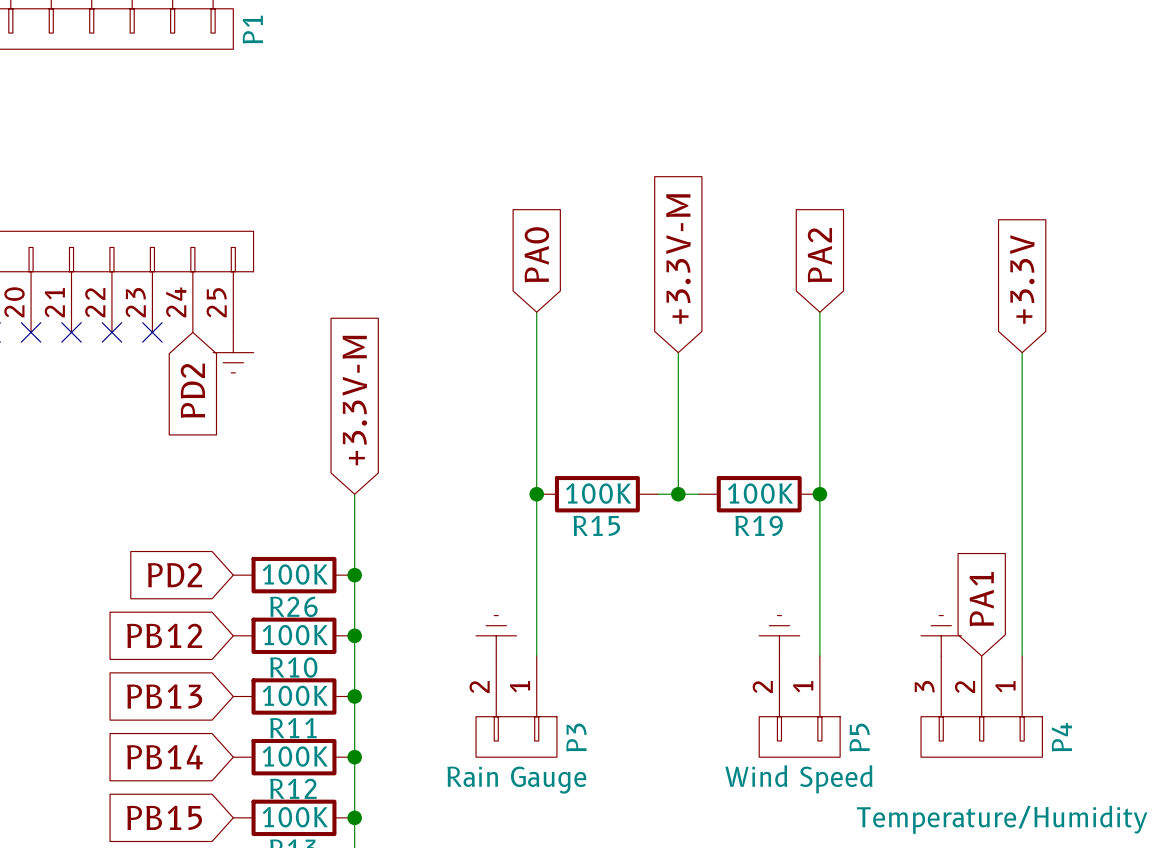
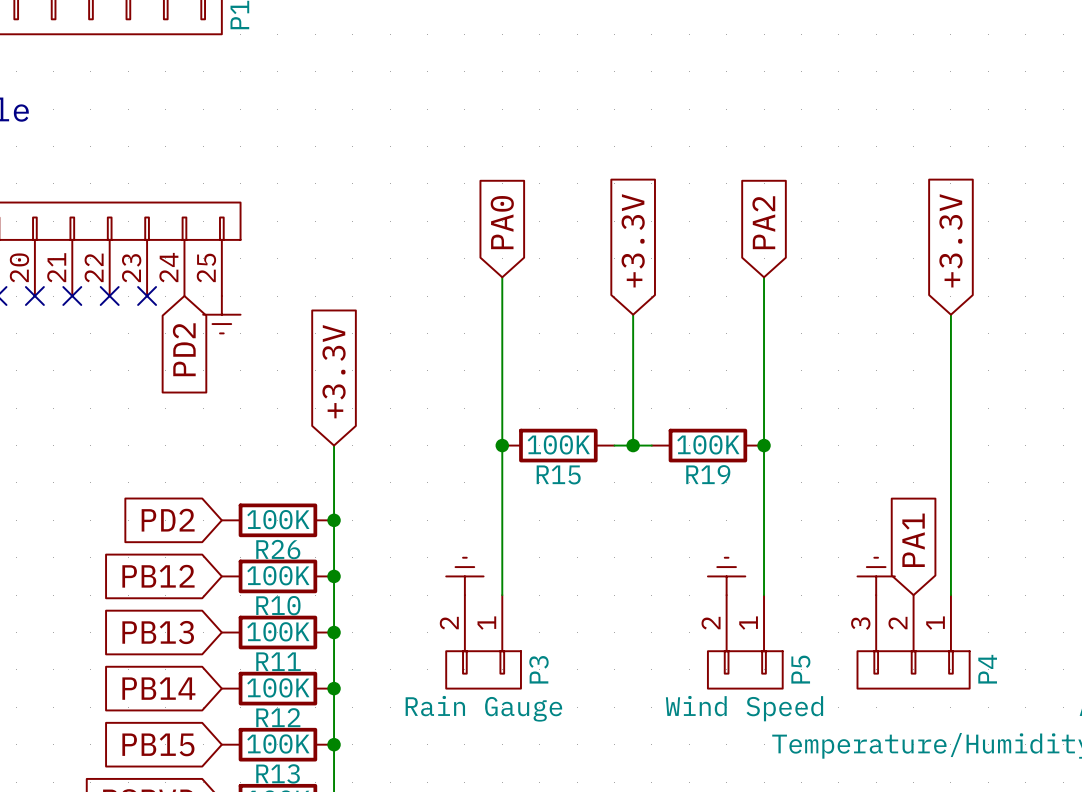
global label: +3.3V-M (678, 258) -> +3.3V (633, 240)
global label: +3.3V-M (354, 400) -> +3.3V (334, 371)

